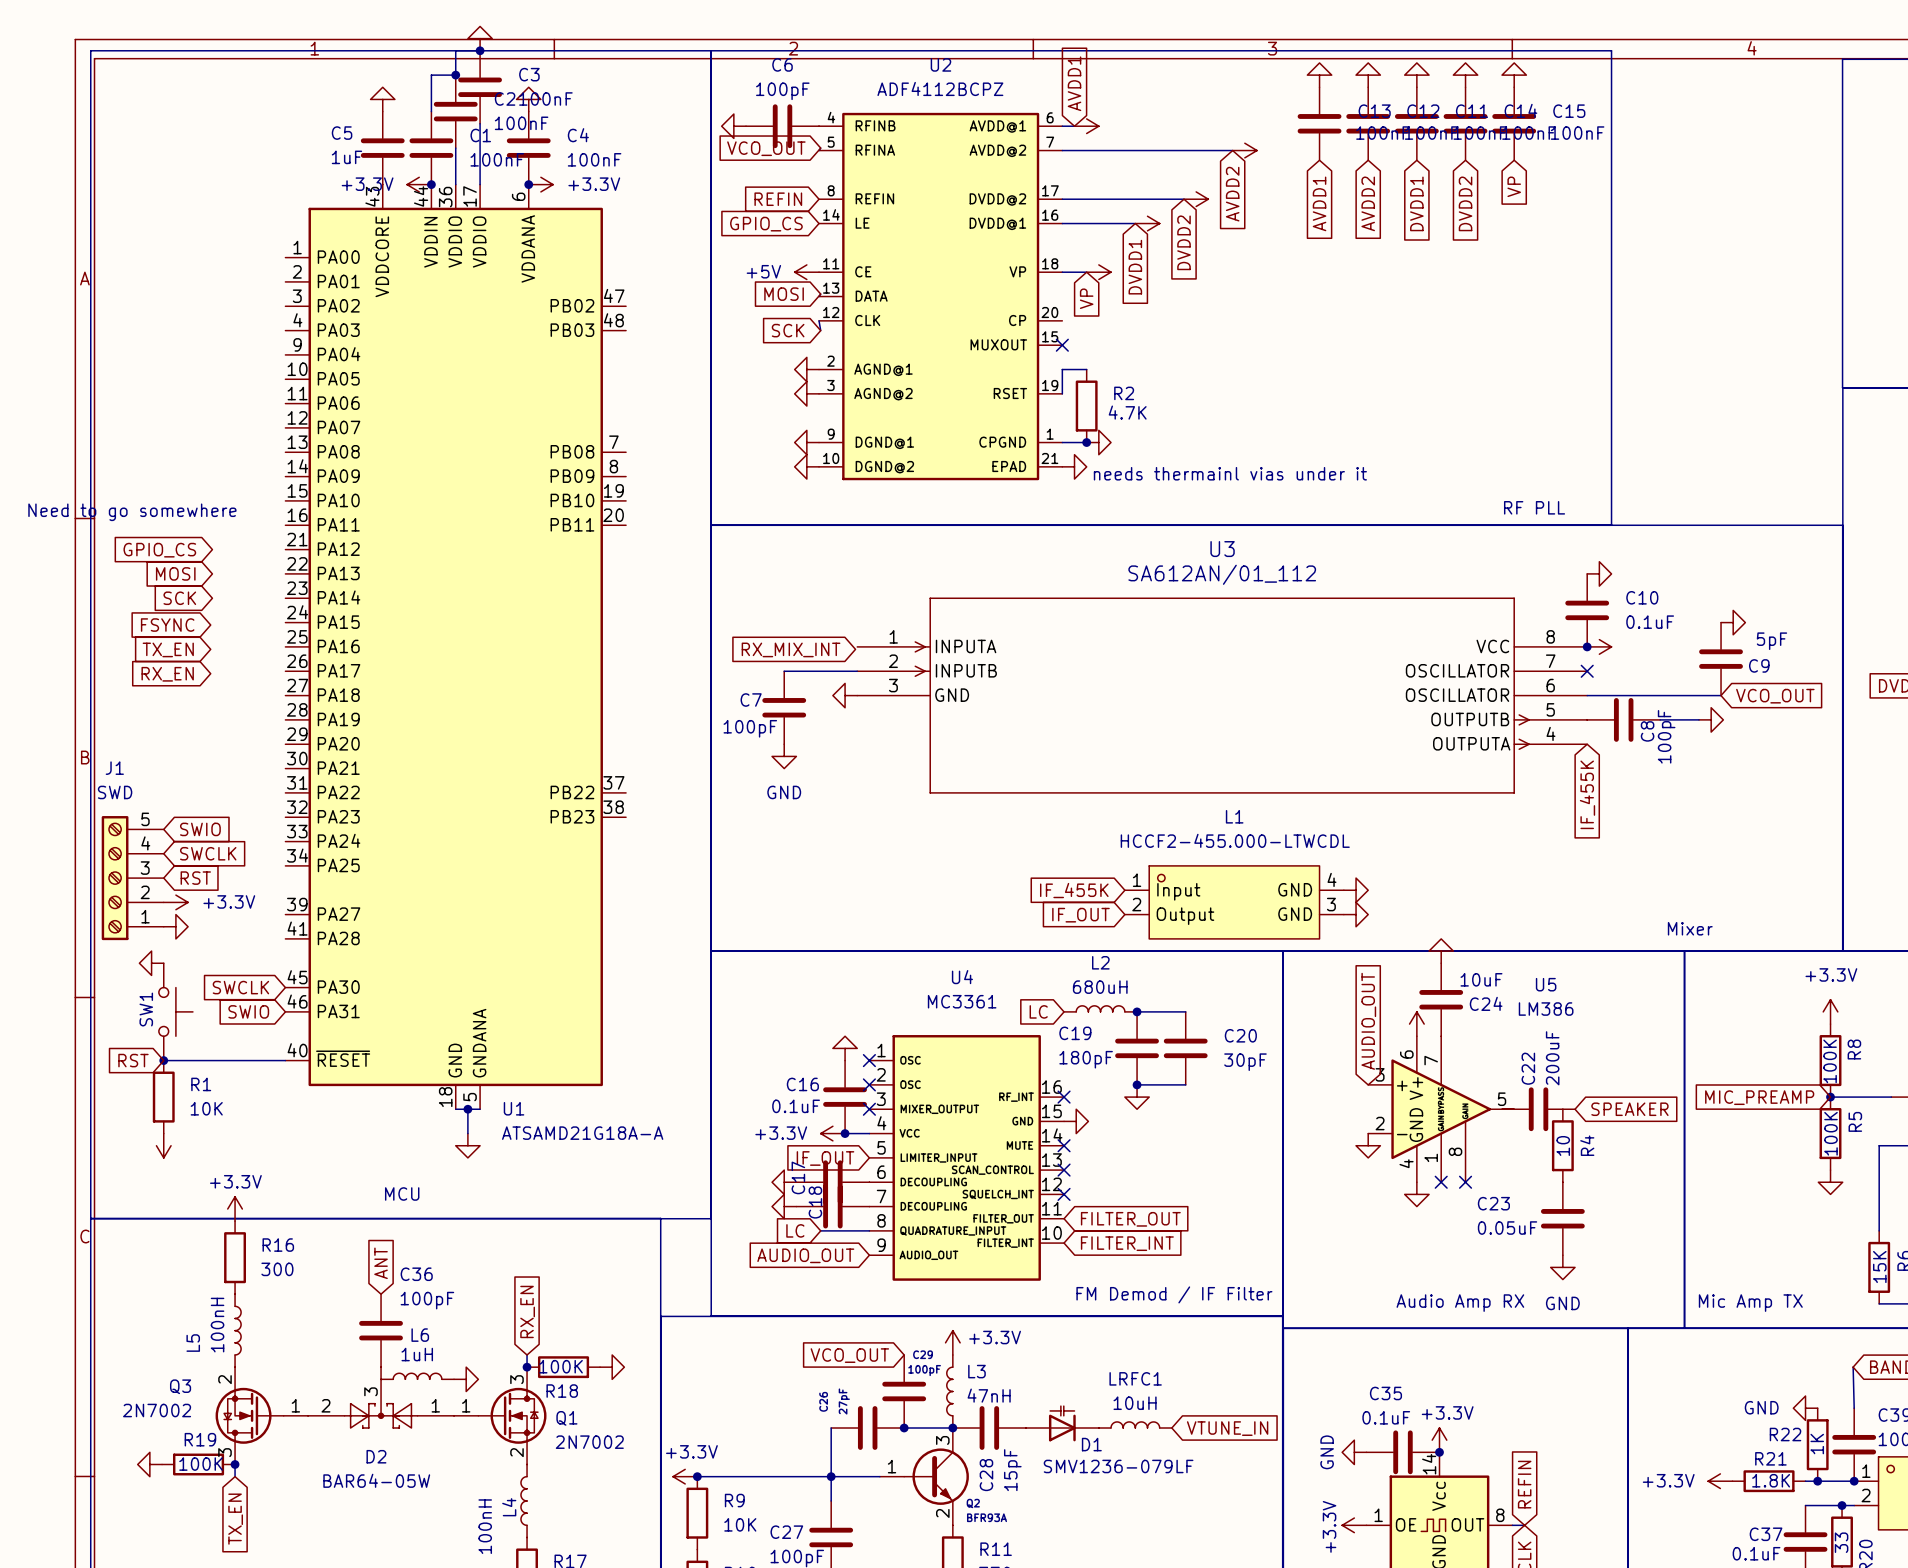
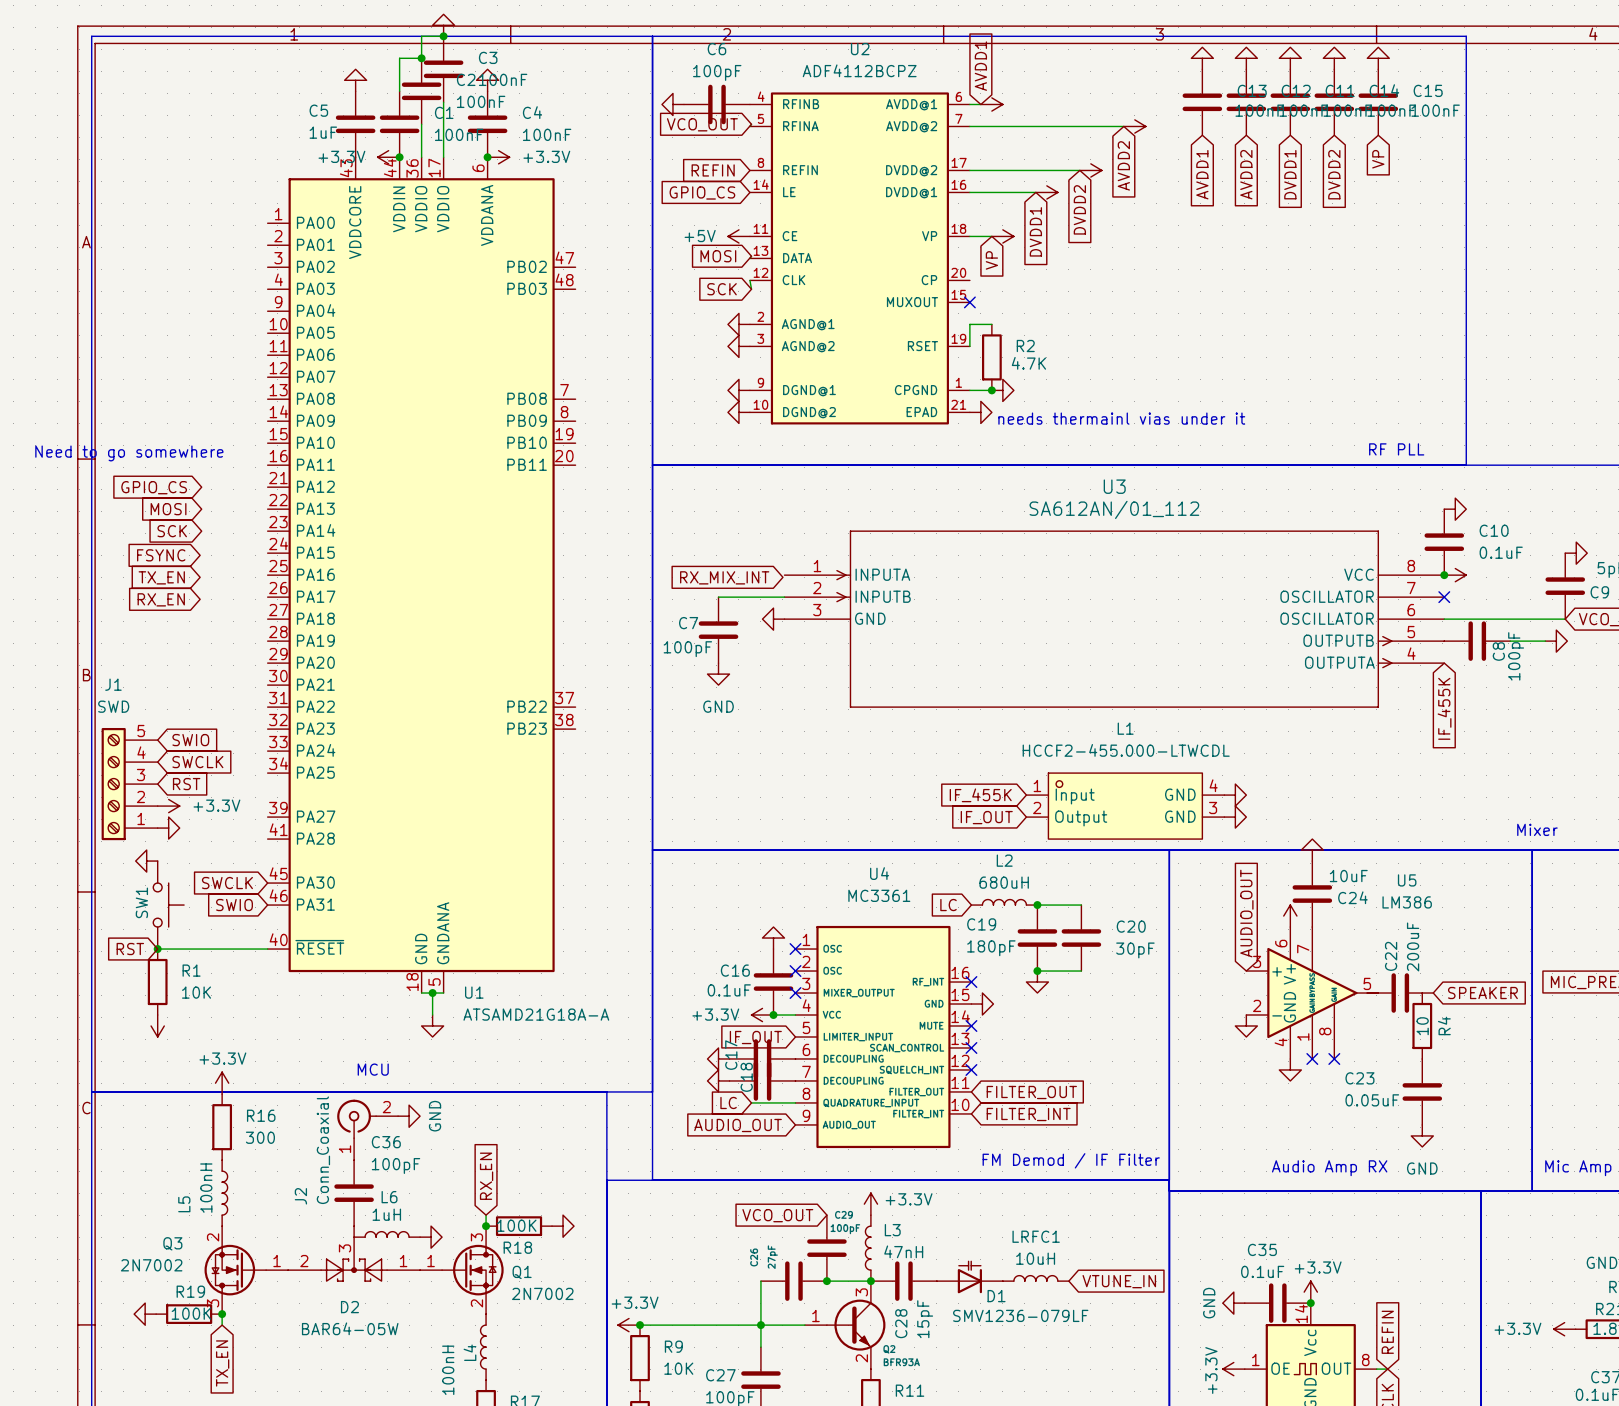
power symbol: none -> GND (409, 1116)
J2: none -> Conn_Coaxial (367, 1129)
global label: ANT (381, 1263) -> none

